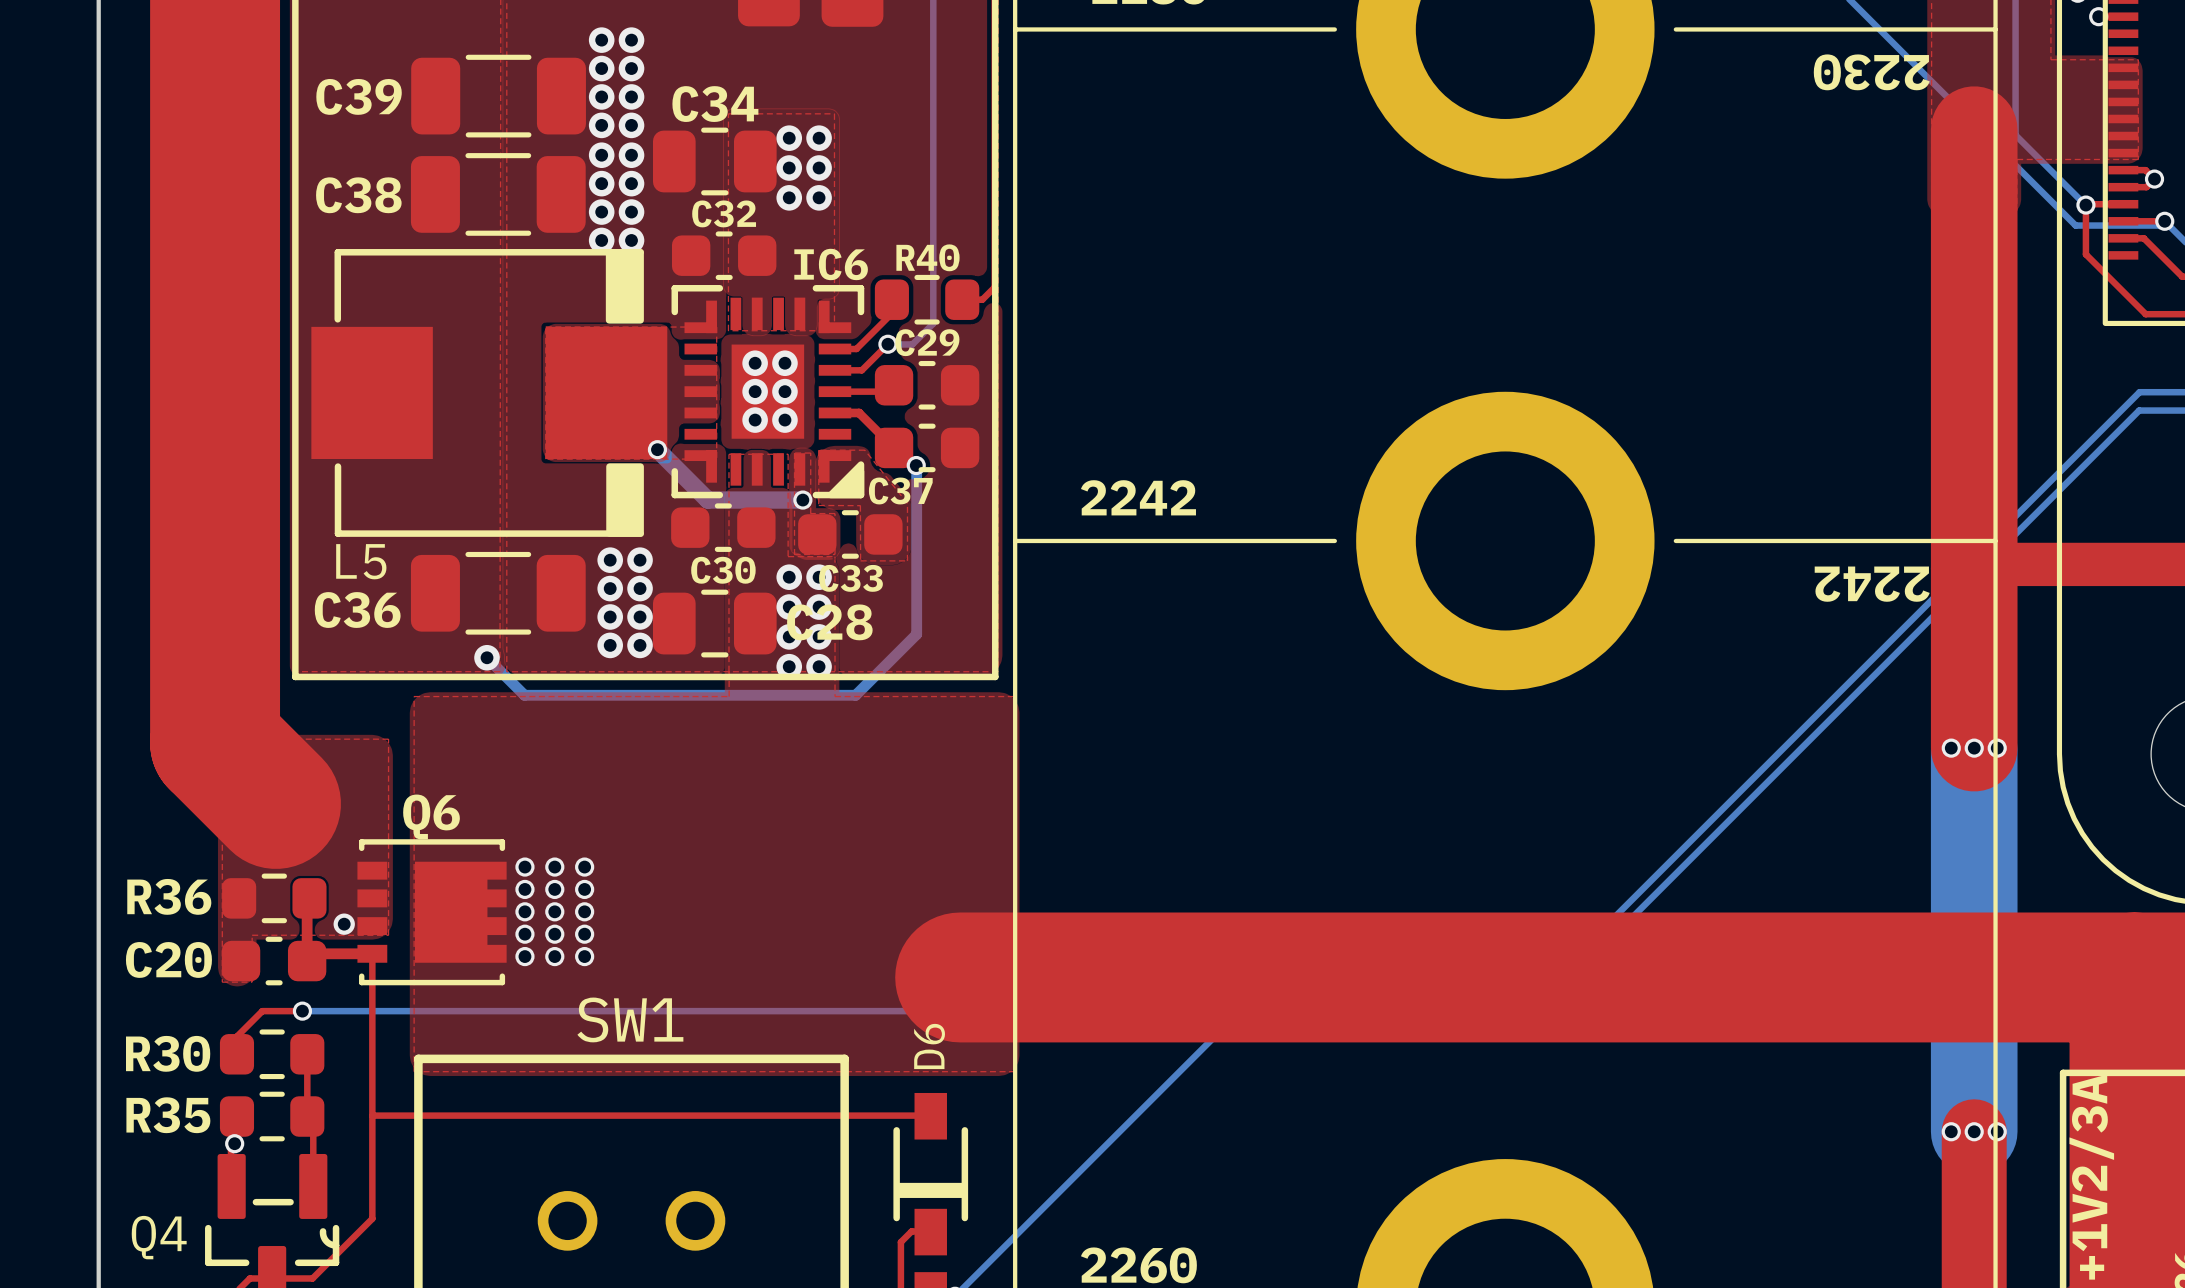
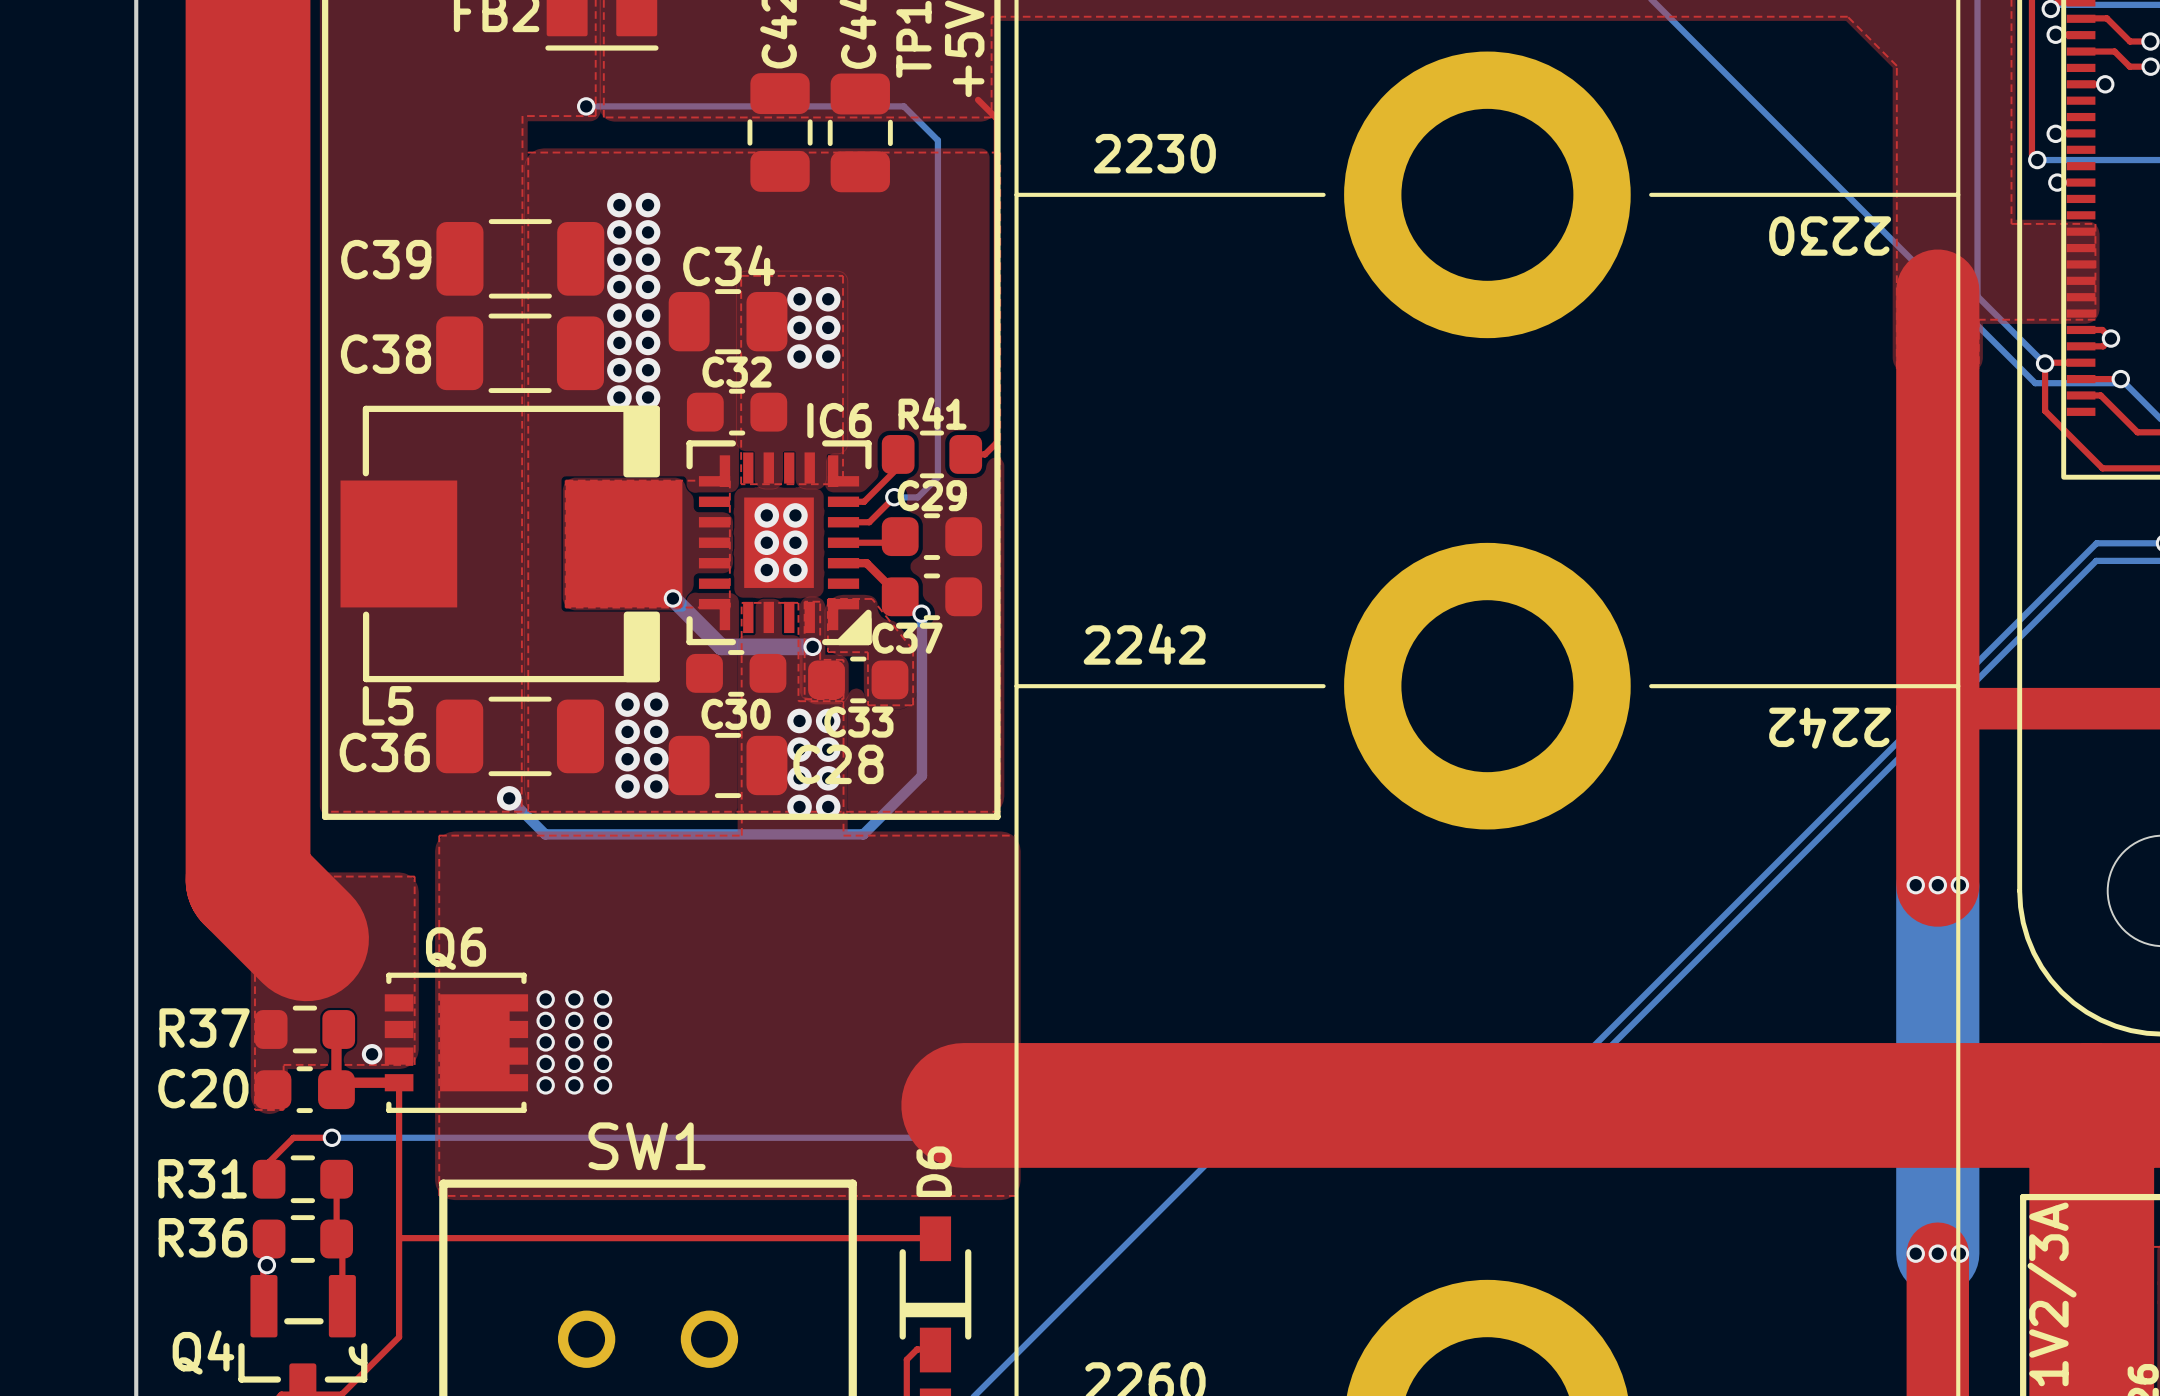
R40 name: R40 (927, 257) -> R41 (932, 413)
R36 name: R36 (169, 896) -> R37 (204, 1028)
R30 name: R30 (168, 1053) -> R31 (202, 1178)
R35 name: R35 (168, 1115) -> R36 (202, 1237)

